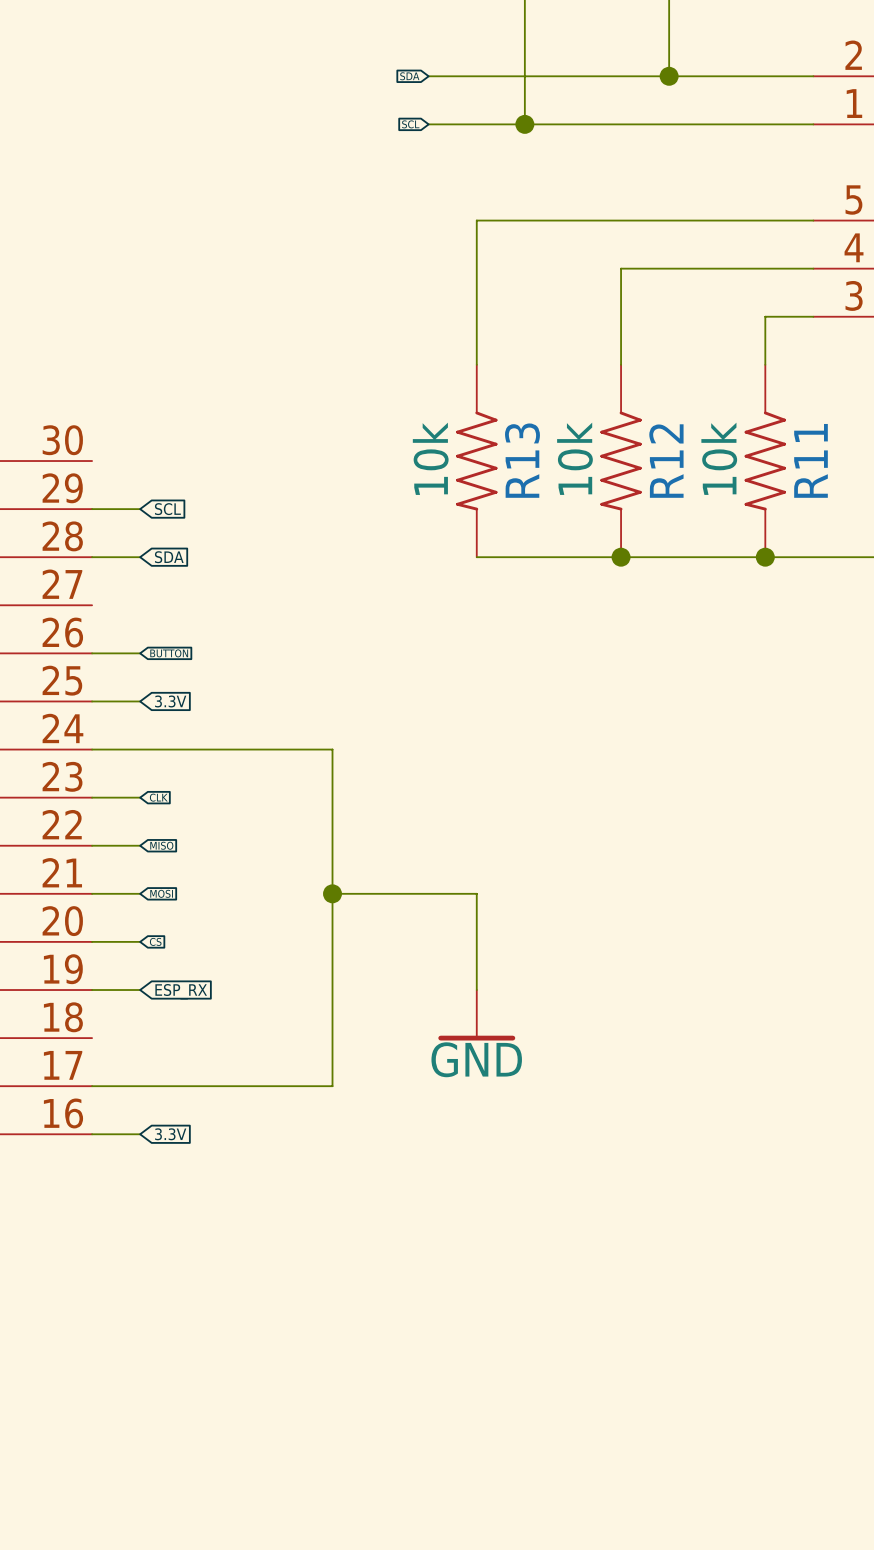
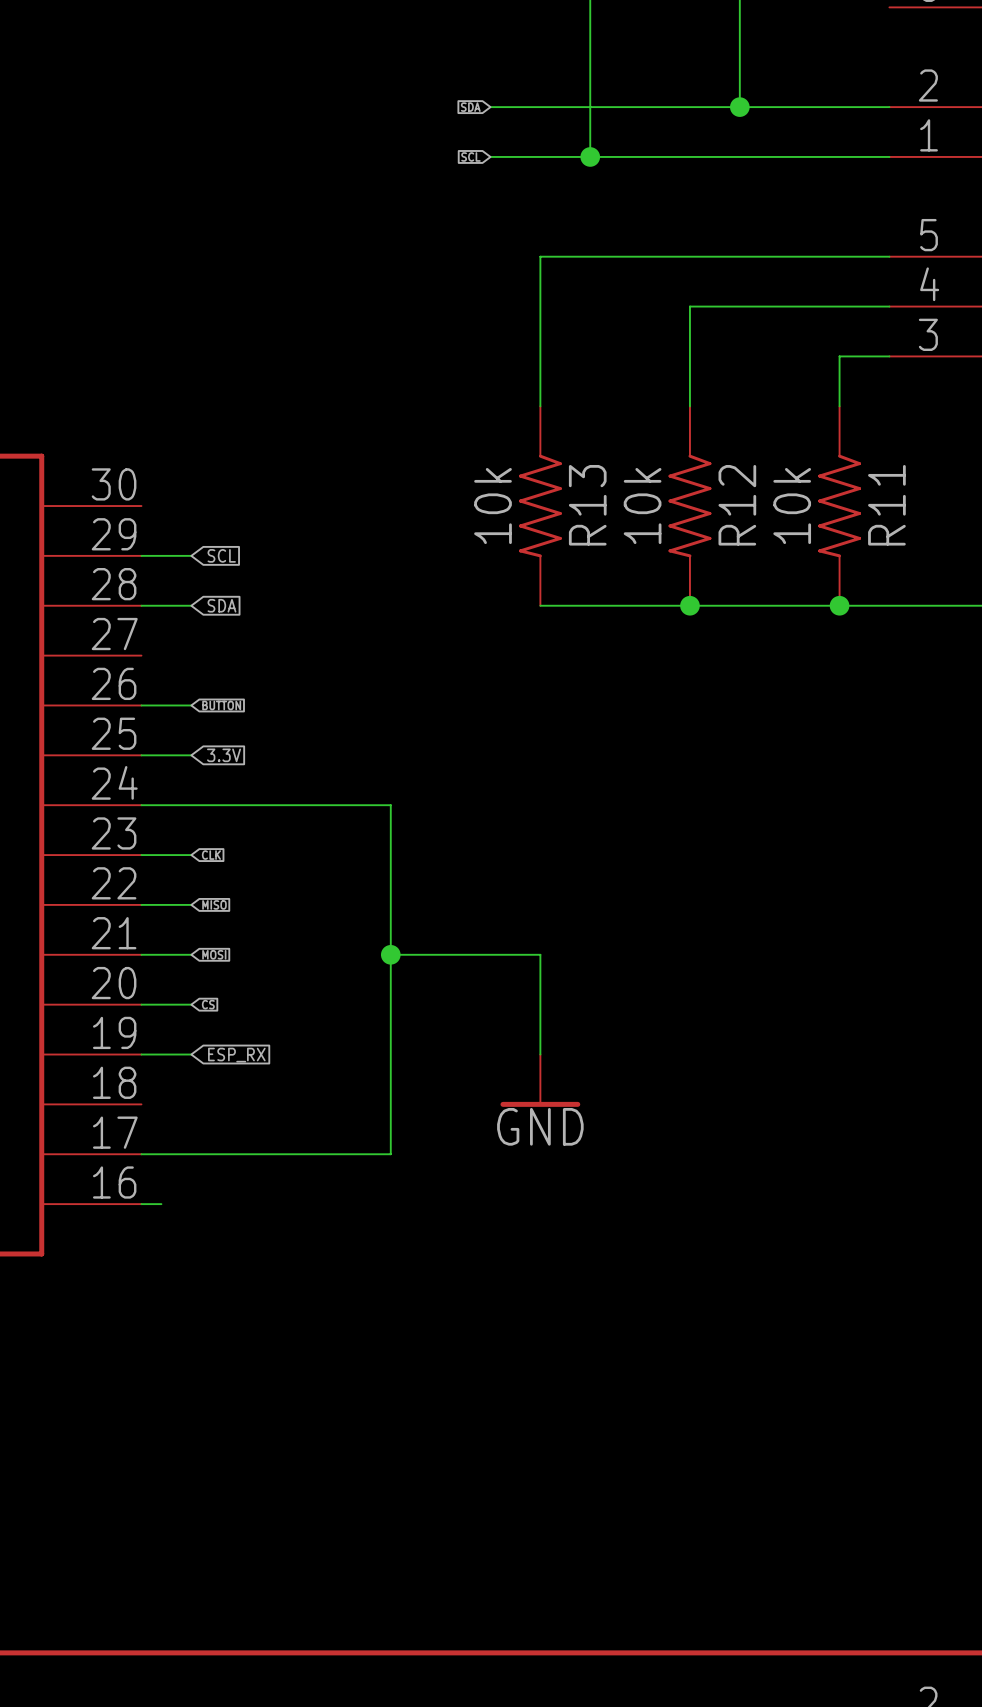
wire: (111, 1134) (140, 1134) -> none
global label: 3.3V (170, 1134) -> none

